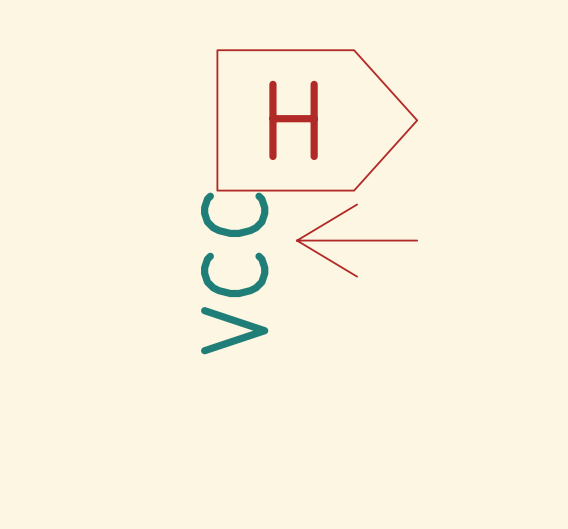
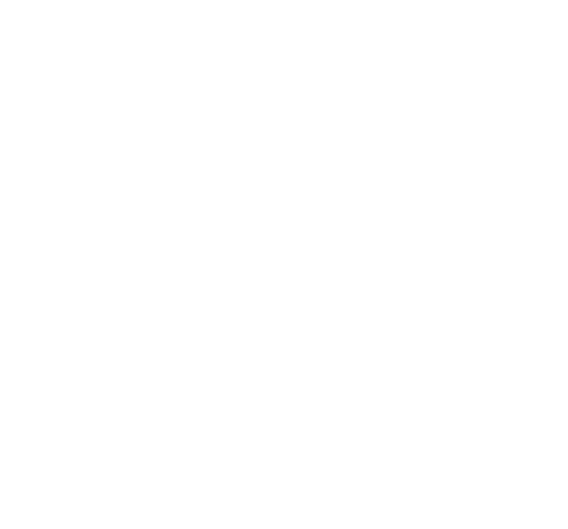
global label: H (293, 120) -> none
power symbol: VCC (357, 240) -> none

